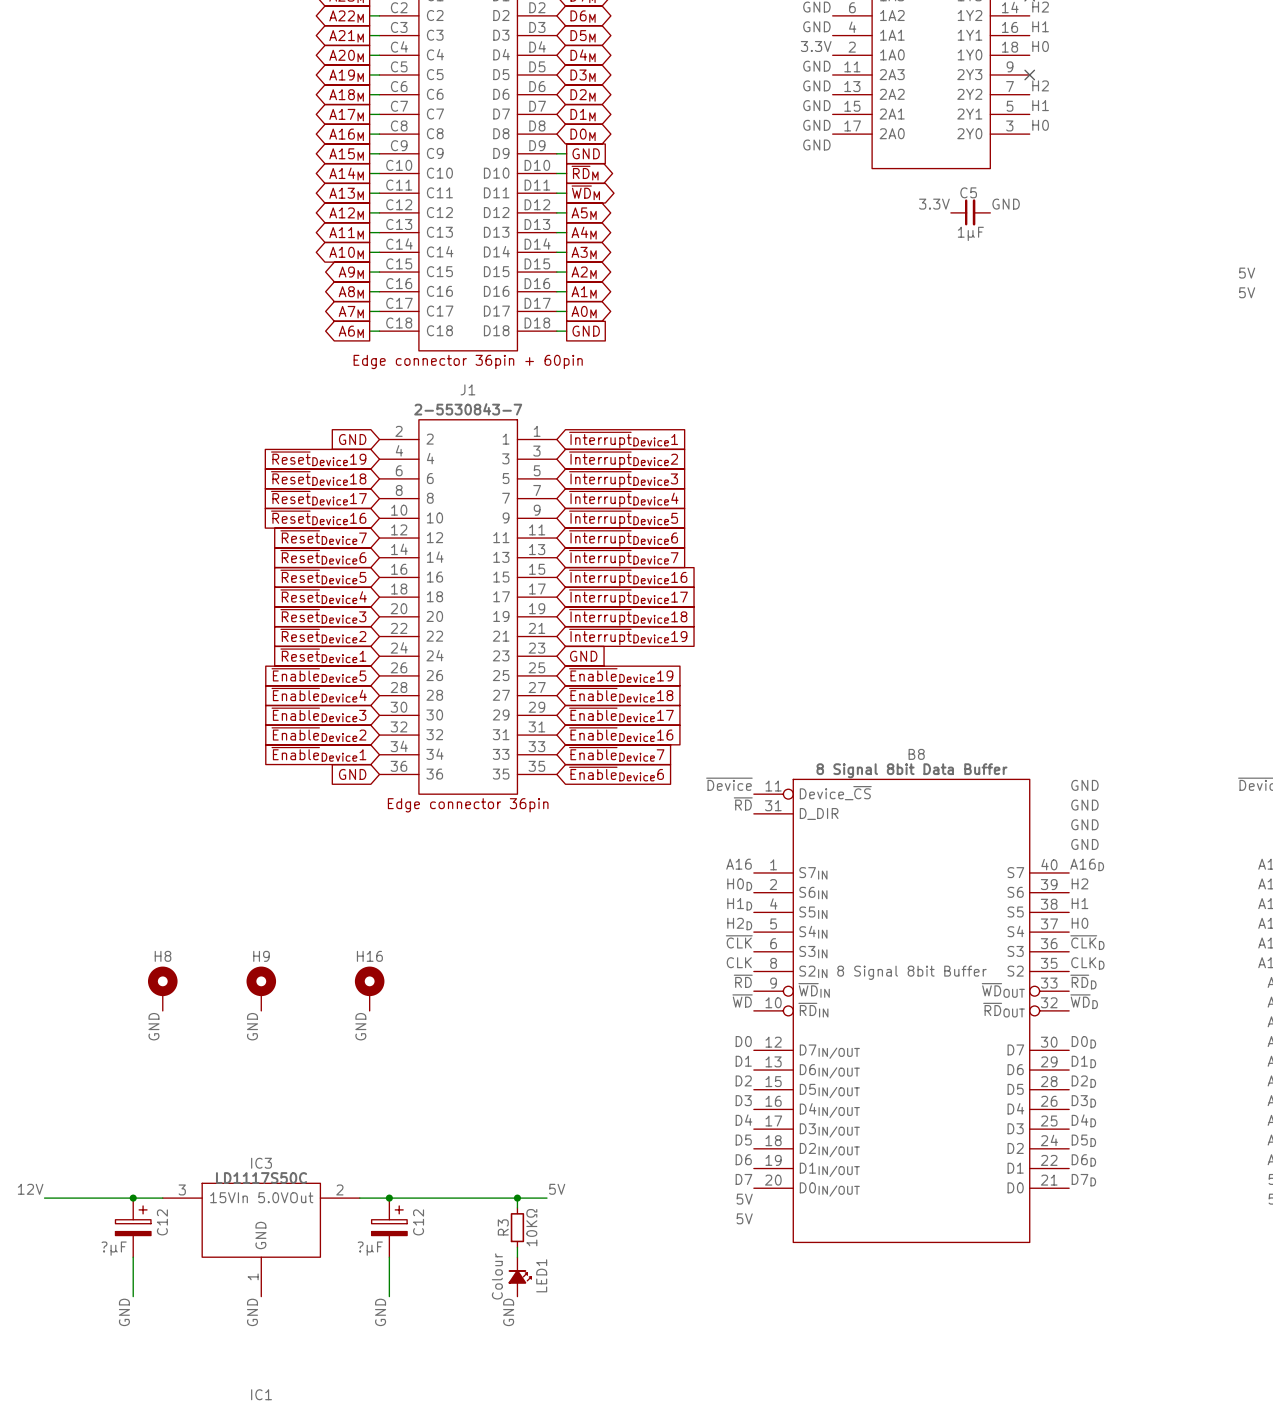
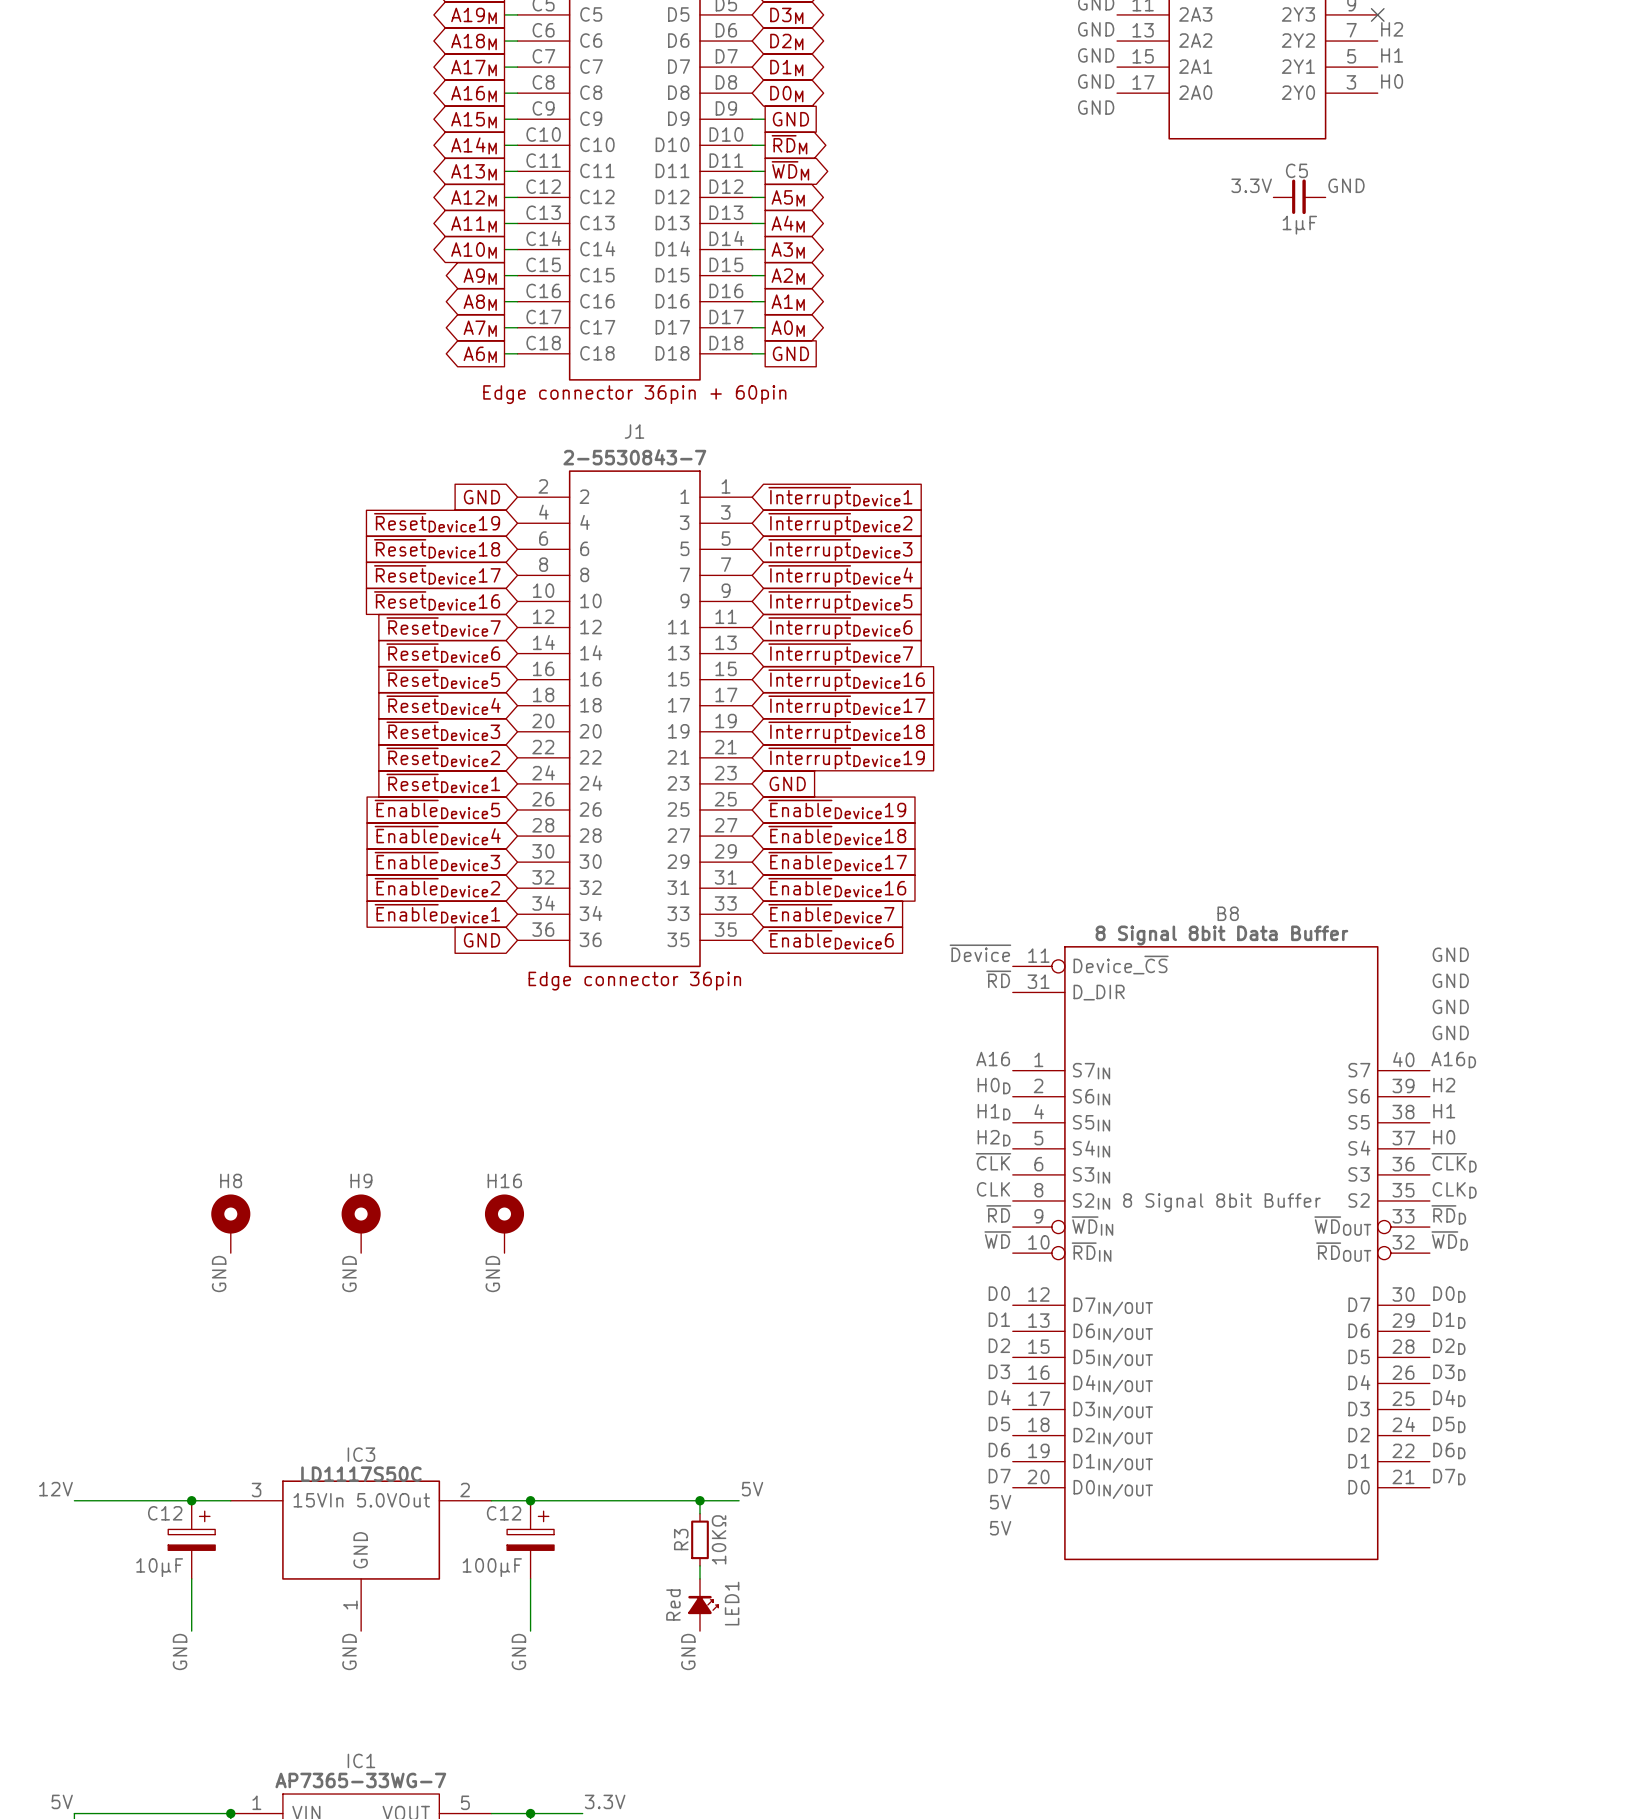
C12 name rotation: 0° (162, 1222) -> 90° clockwise (165, 1513)
C12 name position: C12 (162, 1222) -> C12 (165, 1513)
C12 name rotation: 0° (418, 1222) -> 90° clockwise (504, 1513)
C12 name position: C12 (418, 1222) -> C12 (504, 1513)
C12 value: none -> 10μF (159, 1567)
C12 text: ?μF (114, 1248) -> none
C12 value: none -> 100μF (492, 1567)
C12 text: ?μF (370, 1248) -> none
LED1 text: Colour (497, 1276) -> none
LED1 value: none -> Red (673, 1605)

